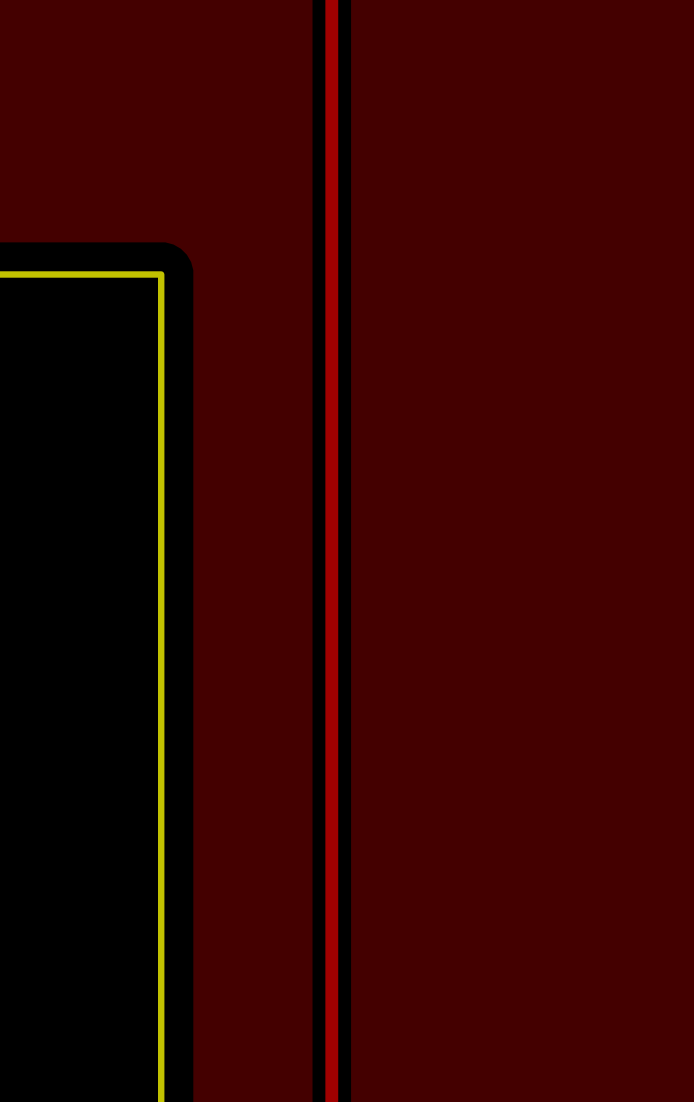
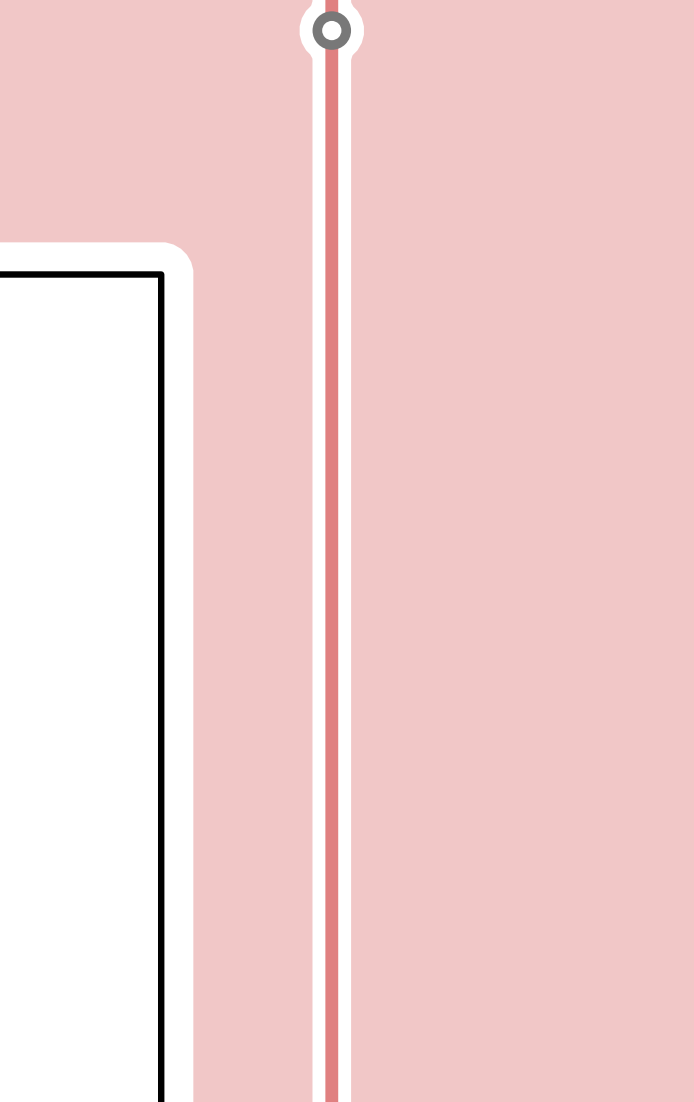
via: none -> (331, 30)

